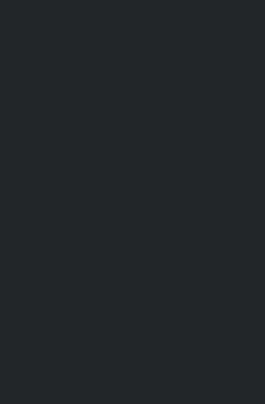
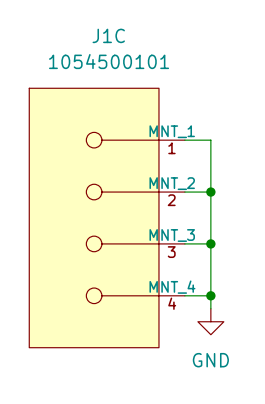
wire: none -> (184, 140) (210, 140) (210, 308)
wire: none -> (184, 192) (210, 192)
junction: none -> (210, 192)
J1C: none -> 1054500101 (107, 217)
wire: none -> (184, 243) (210, 243)
junction: none -> (210, 243)
wire: none -> (184, 295) (210, 295)
junction: none -> (210, 295)
power symbol: none -> GND (210, 321)

